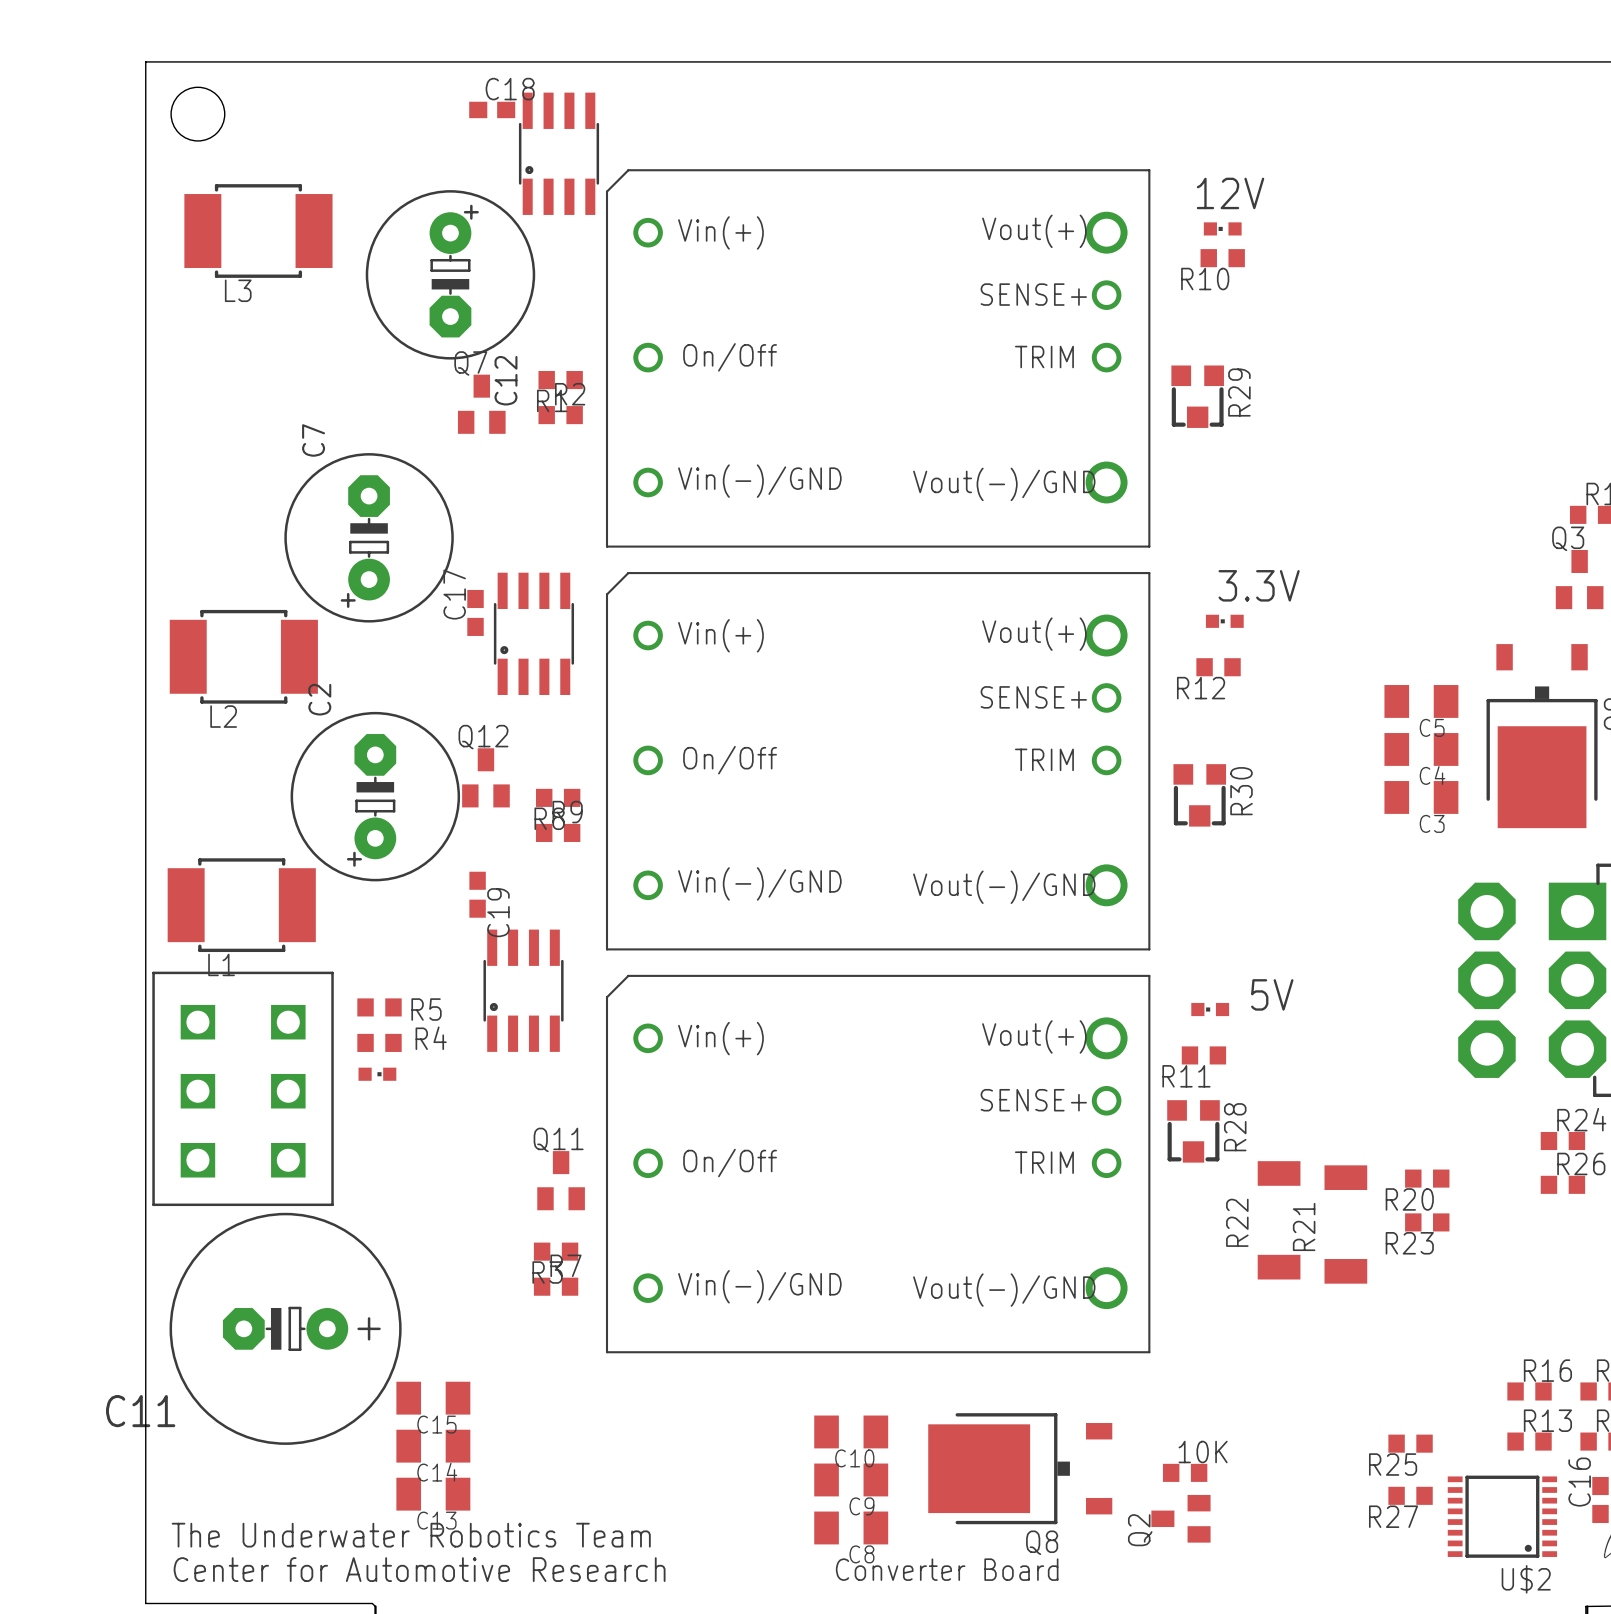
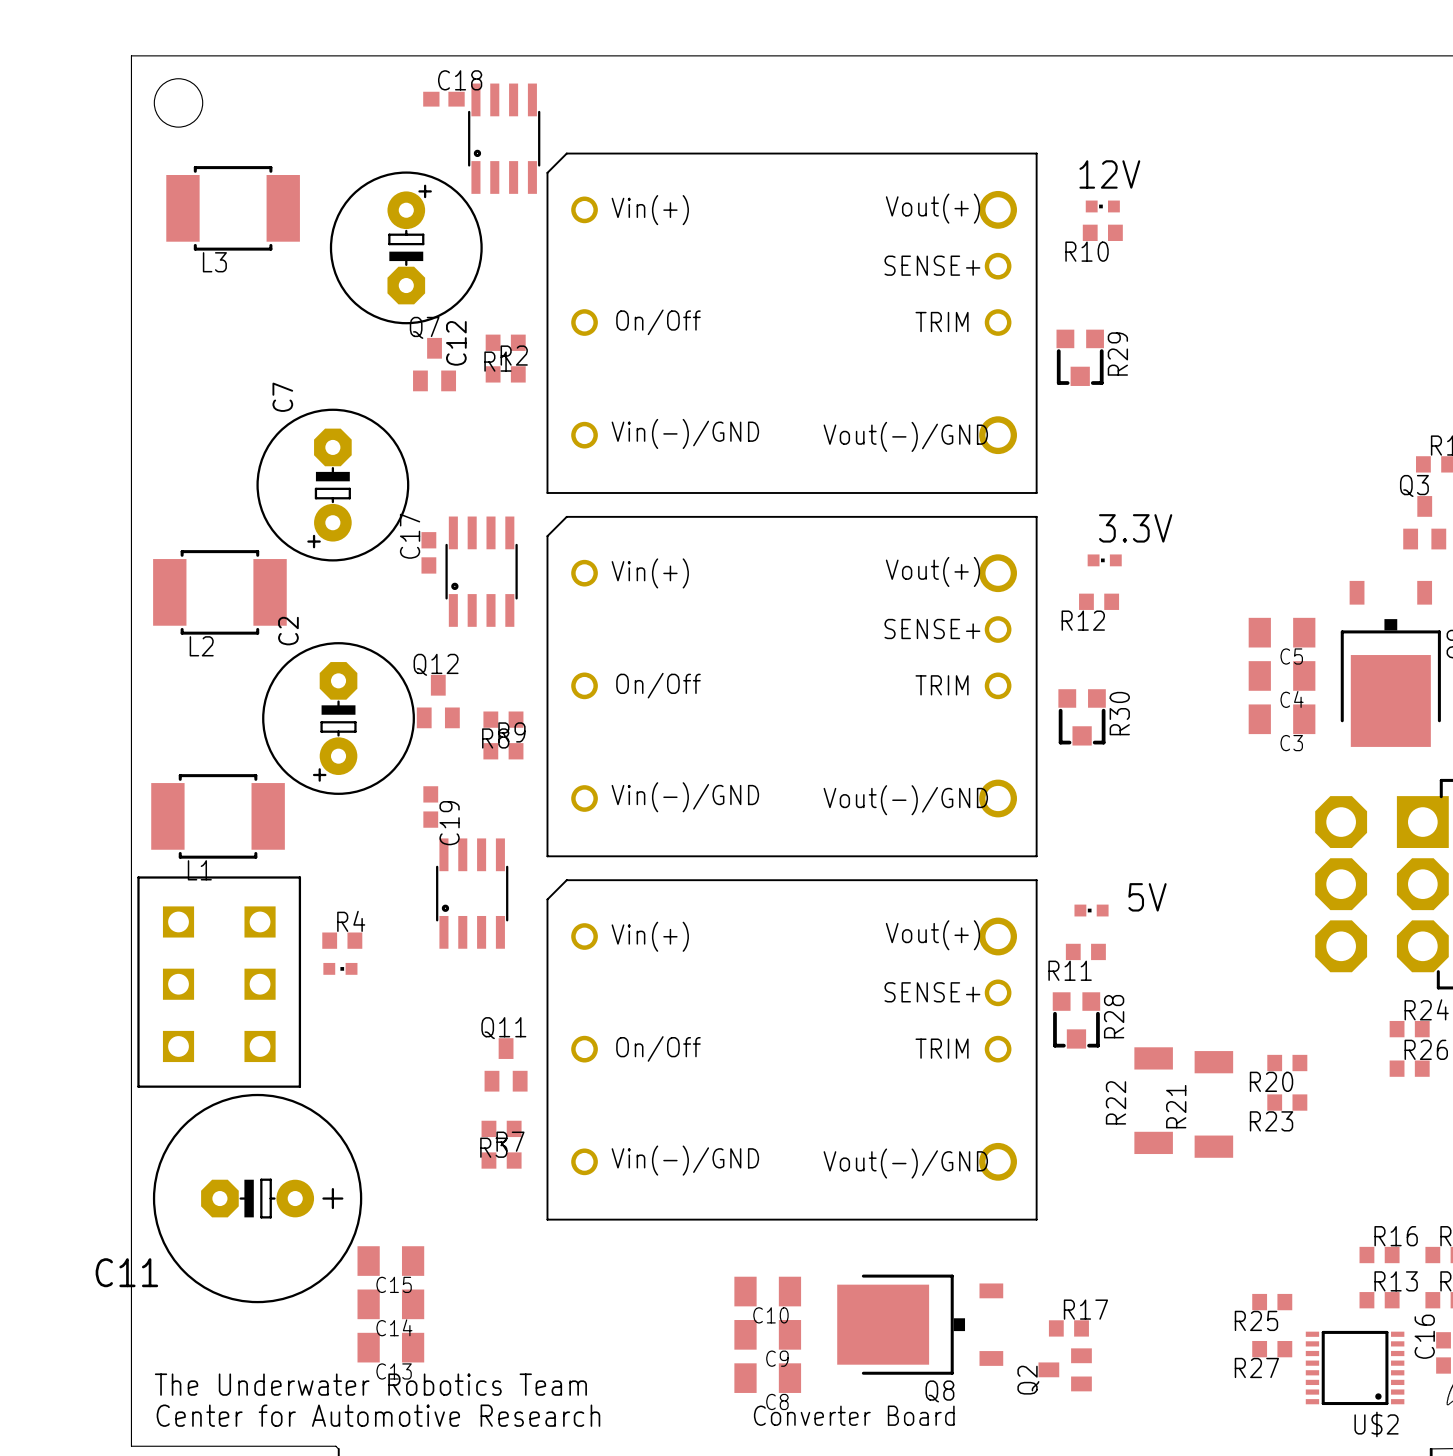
R5: (379, 1007) -> none
R4 name position: R4 (431, 1038) -> R4 (351, 921)
10K name: 10K (1203, 1452) -> R17 (1085, 1309)

